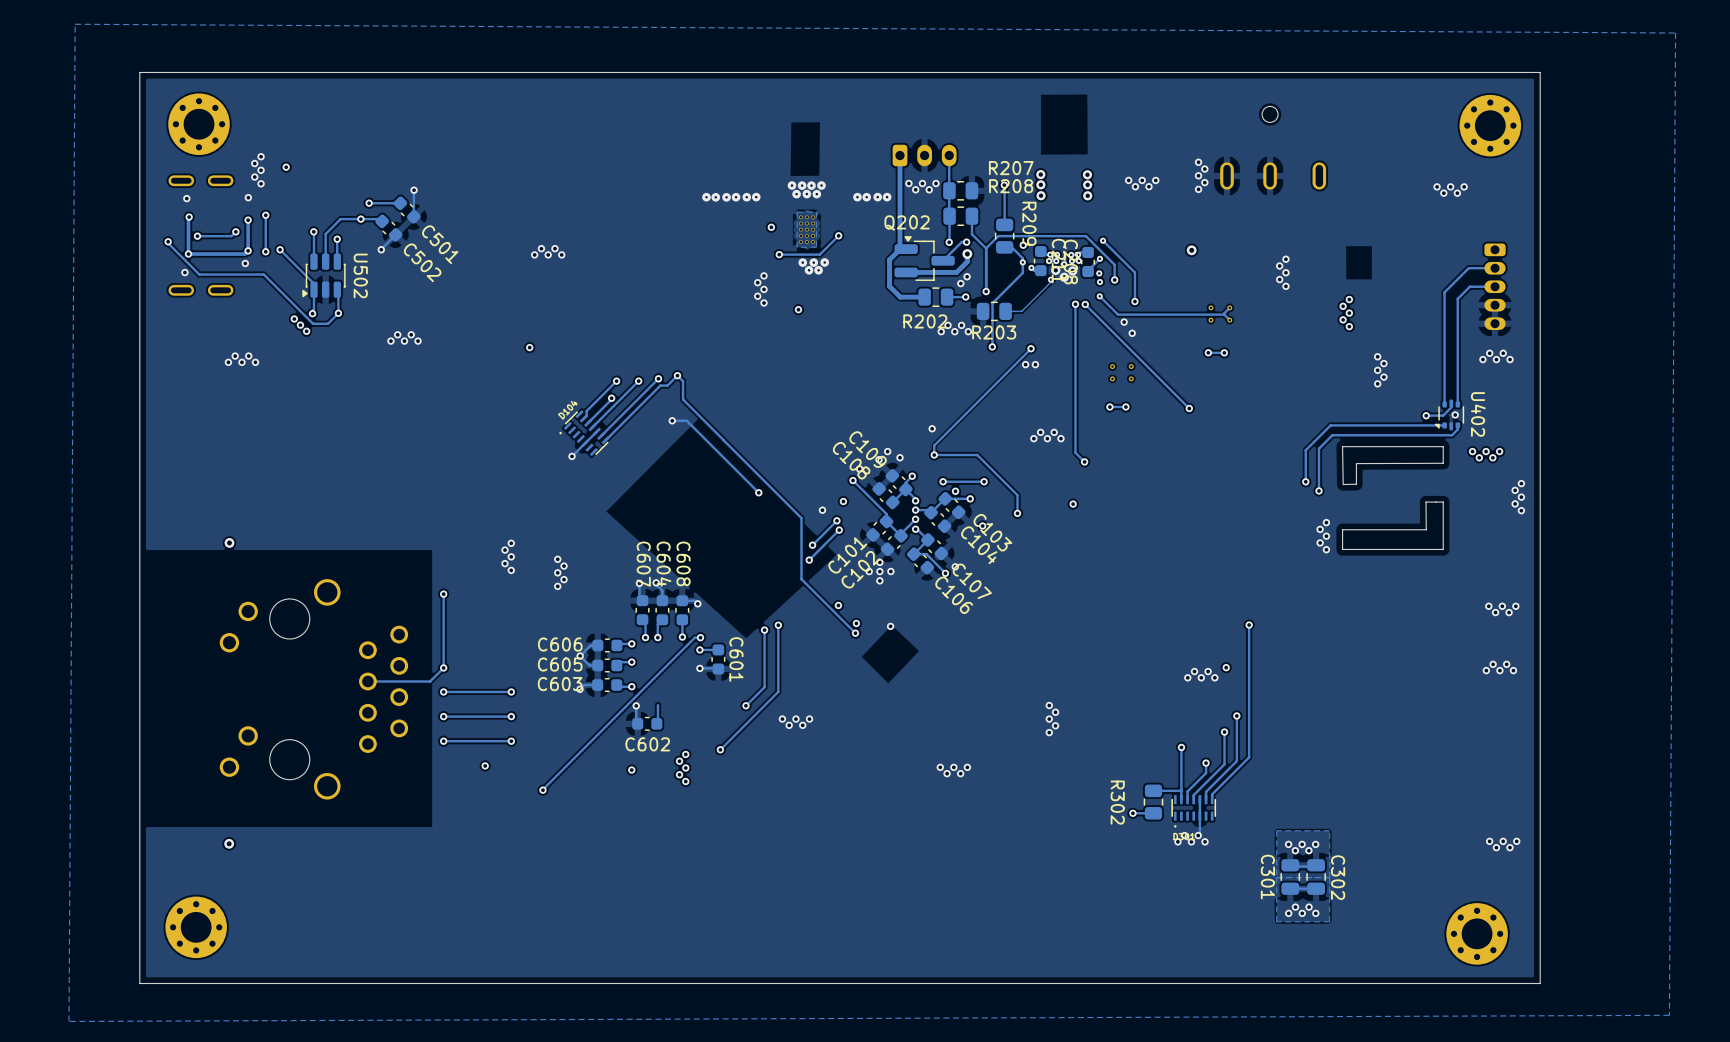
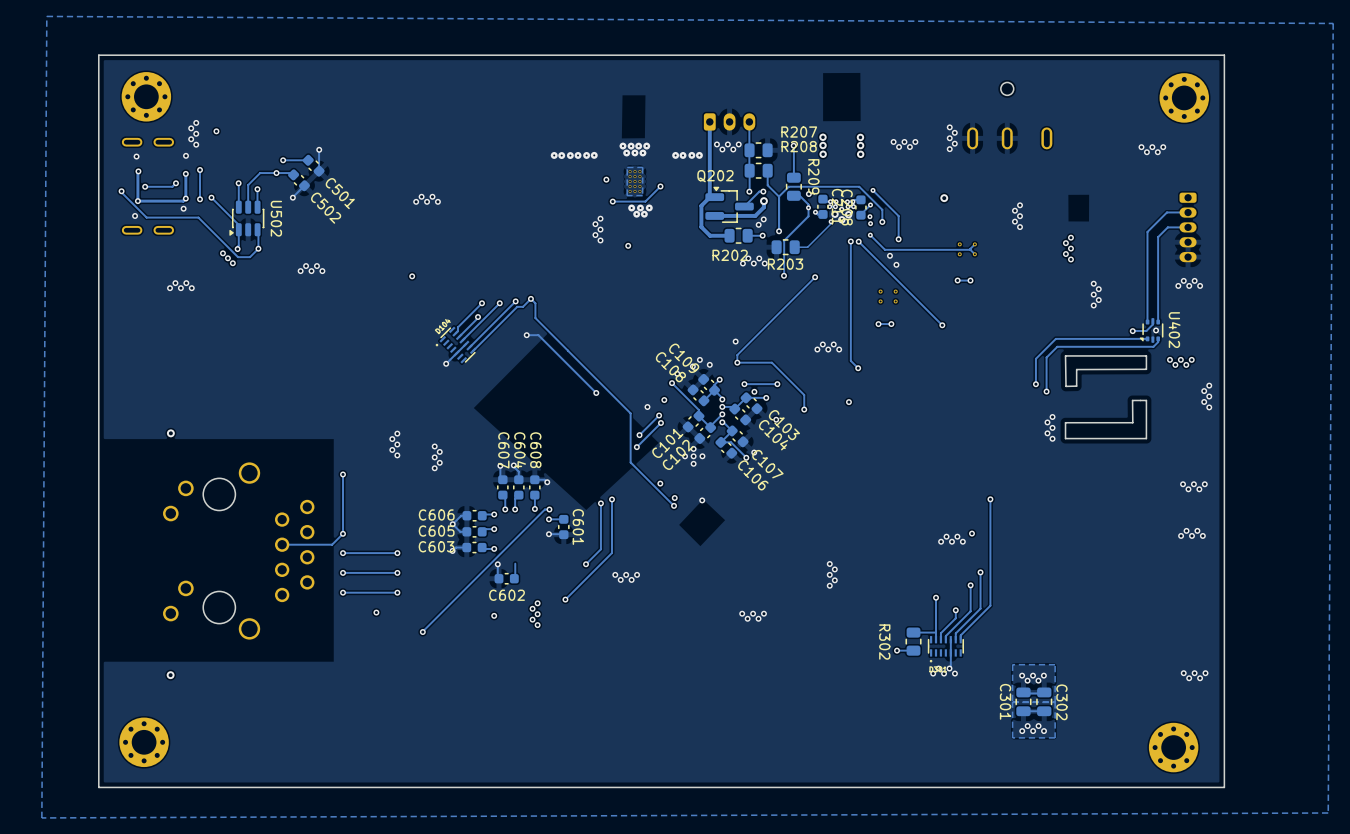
via: (1025, 364) -> none
via: (1035, 364) -> none

